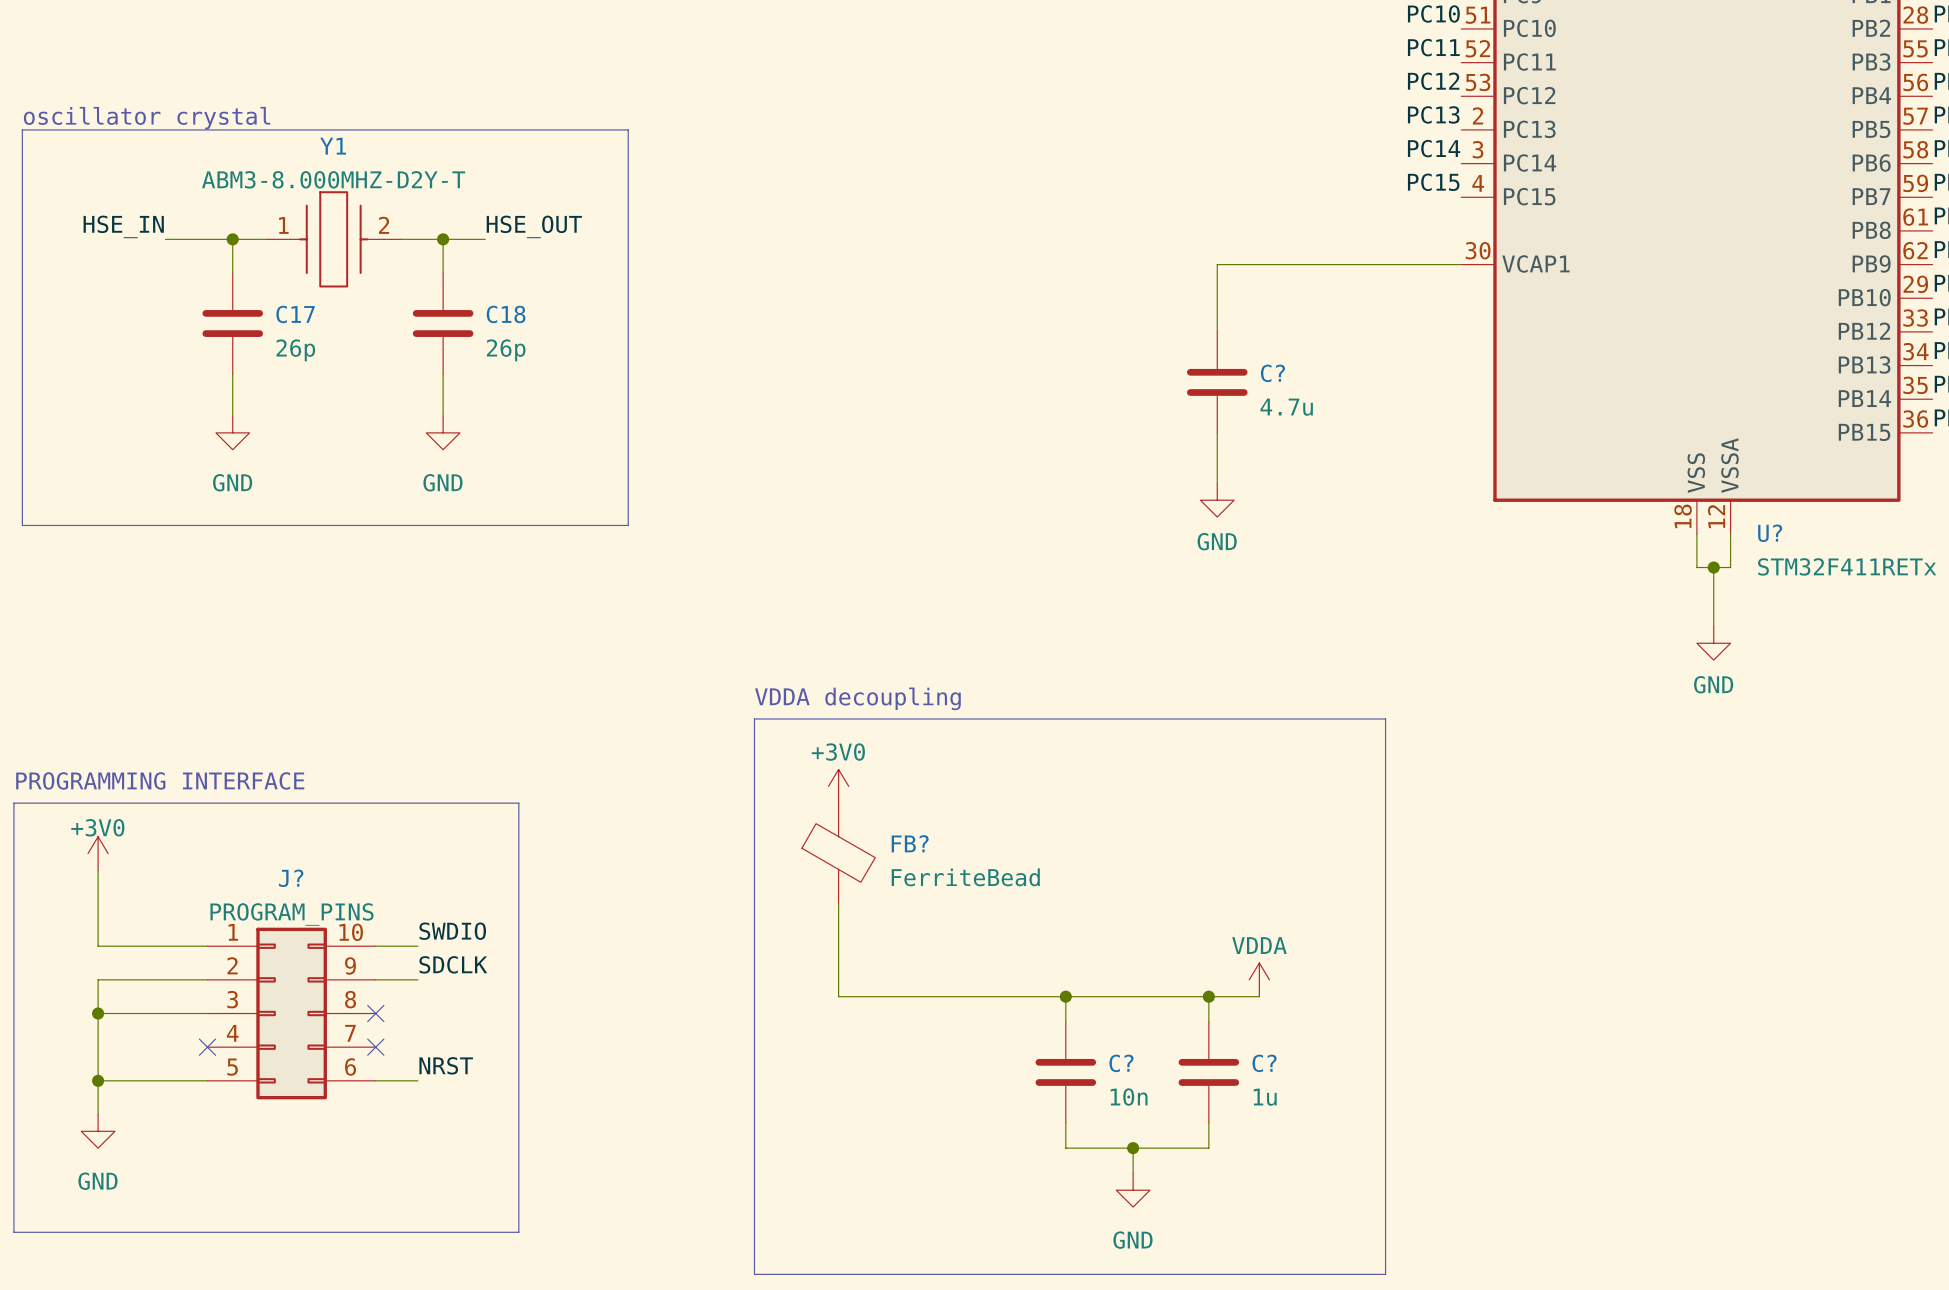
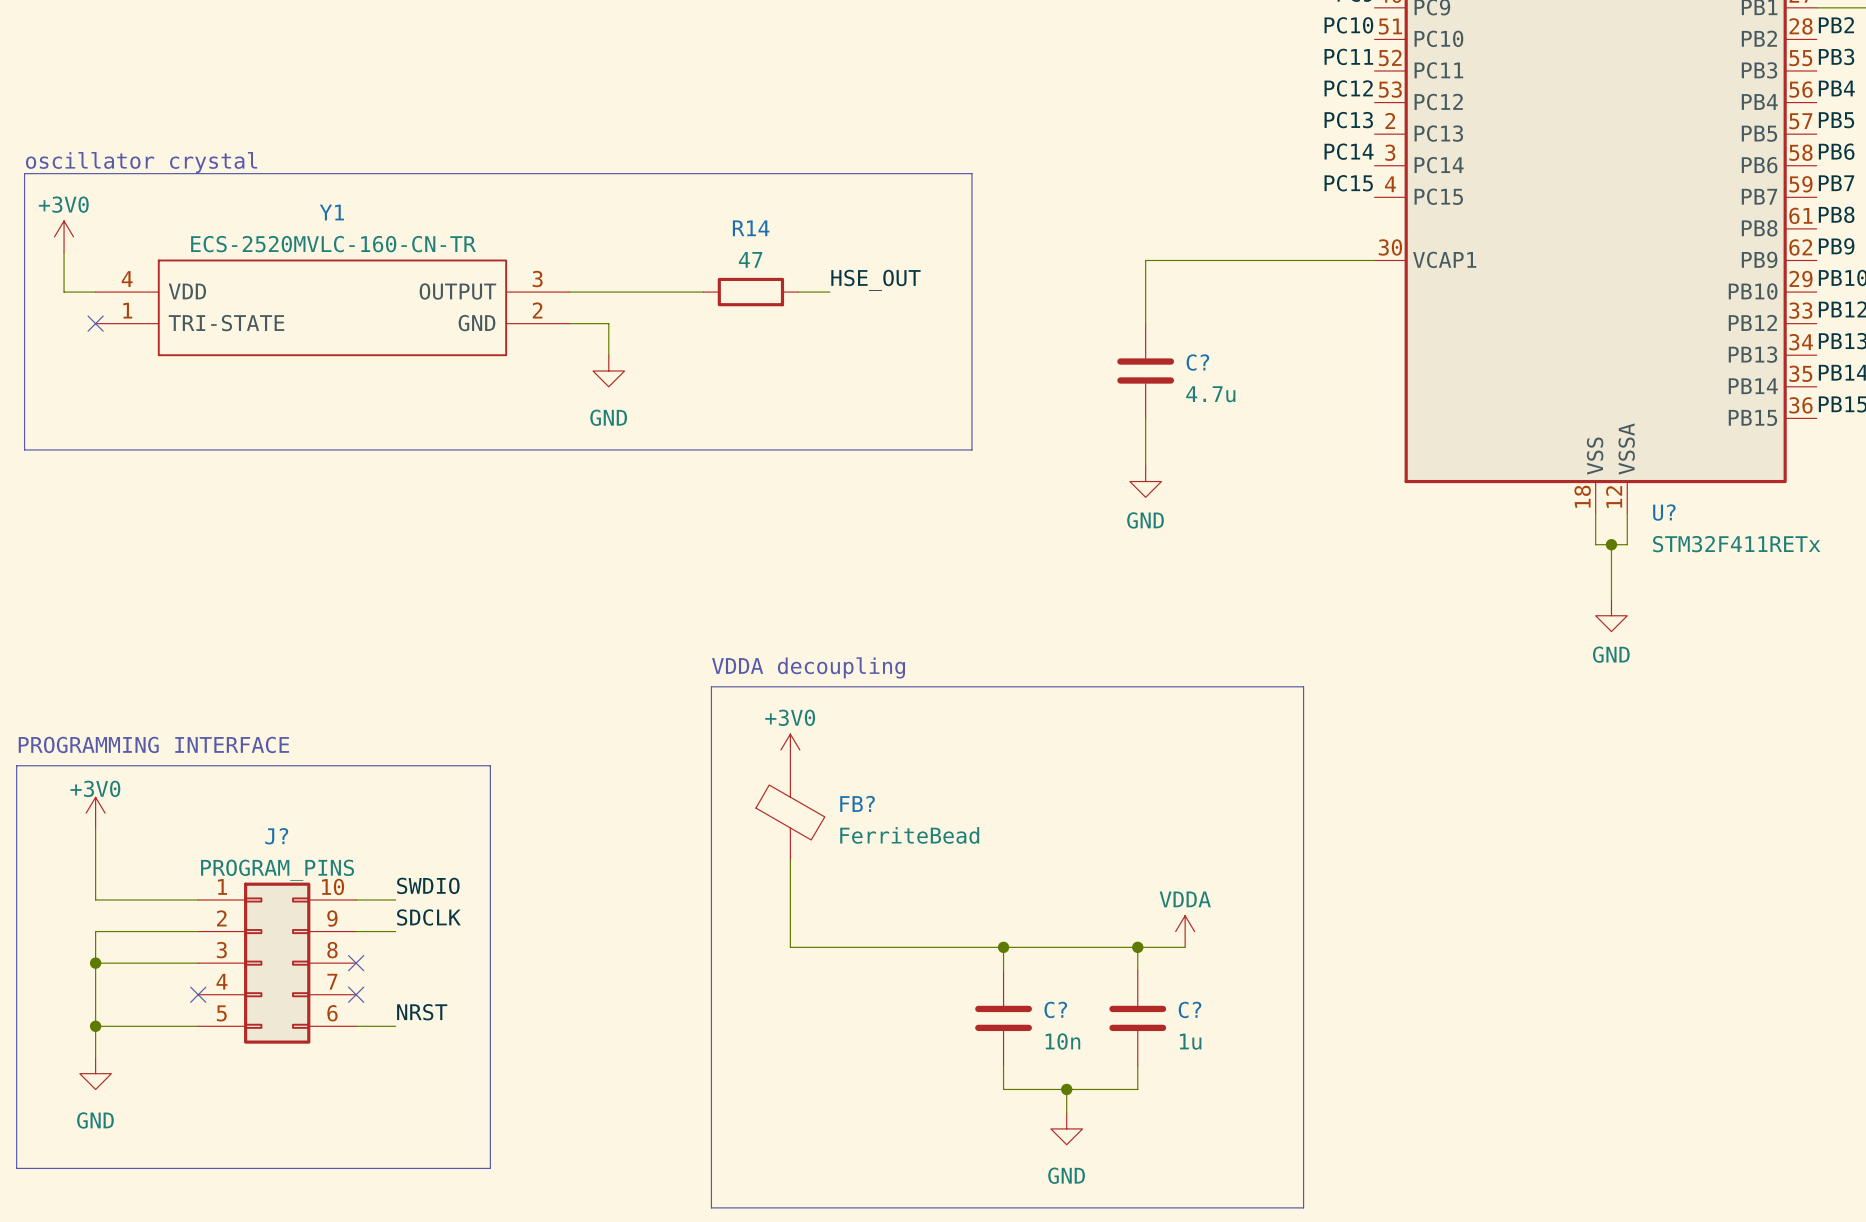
text position: oscillator crystal (147, 118) -> oscillator crystal (141, 162)
line: (22, 172) (22, 129) (628, 129) (628, 525) (22, 525) (22, 466) -> (24, 173) (971, 173) (971, 449) (24, 449)
Y1 value: ABM3-8.000MHZ-D2Y-T (333, 179) -> ECS-2520MVLC-160-CN-TR (333, 244)
Y1 symbol: [266, 191, 402, 288] -> [95, 259, 570, 357]
label: HSE_IN (123, 226) -> none
label: HSE_OUT (534, 226) -> none
power symbol: none -> +3V0 (64, 236)
wire: (165, 239) (266, 239) -> none
wire: (232, 239) (232, 273) -> none
junction: (232, 239) -> none
wire: (401, 239) (485, 239) -> none
wire: (443, 239) (443, 273) -> none
junction: (443, 239) -> none
wire: none -> (64, 252) (64, 292) (95, 292)
label: none -> HSE_OUT (875, 280)
wire: none -> (569, 292) (703, 292)
R14: none -> 47 (750, 292)
wire: none -> (798, 292) (829, 292)
C17: 26p (232, 323) -> none
C18: 26p (443, 323) -> none
no-connect mark: none -> (95, 323)
wire: none -> (569, 323) (608, 323) (608, 355)
wire: (232, 373) (232, 416) -> none
wire: (443, 373) (443, 416) -> none
power symbol: none -> GND (608, 371)
power symbol: GND (232, 432) -> none
power symbol: GND (443, 432) -> none

